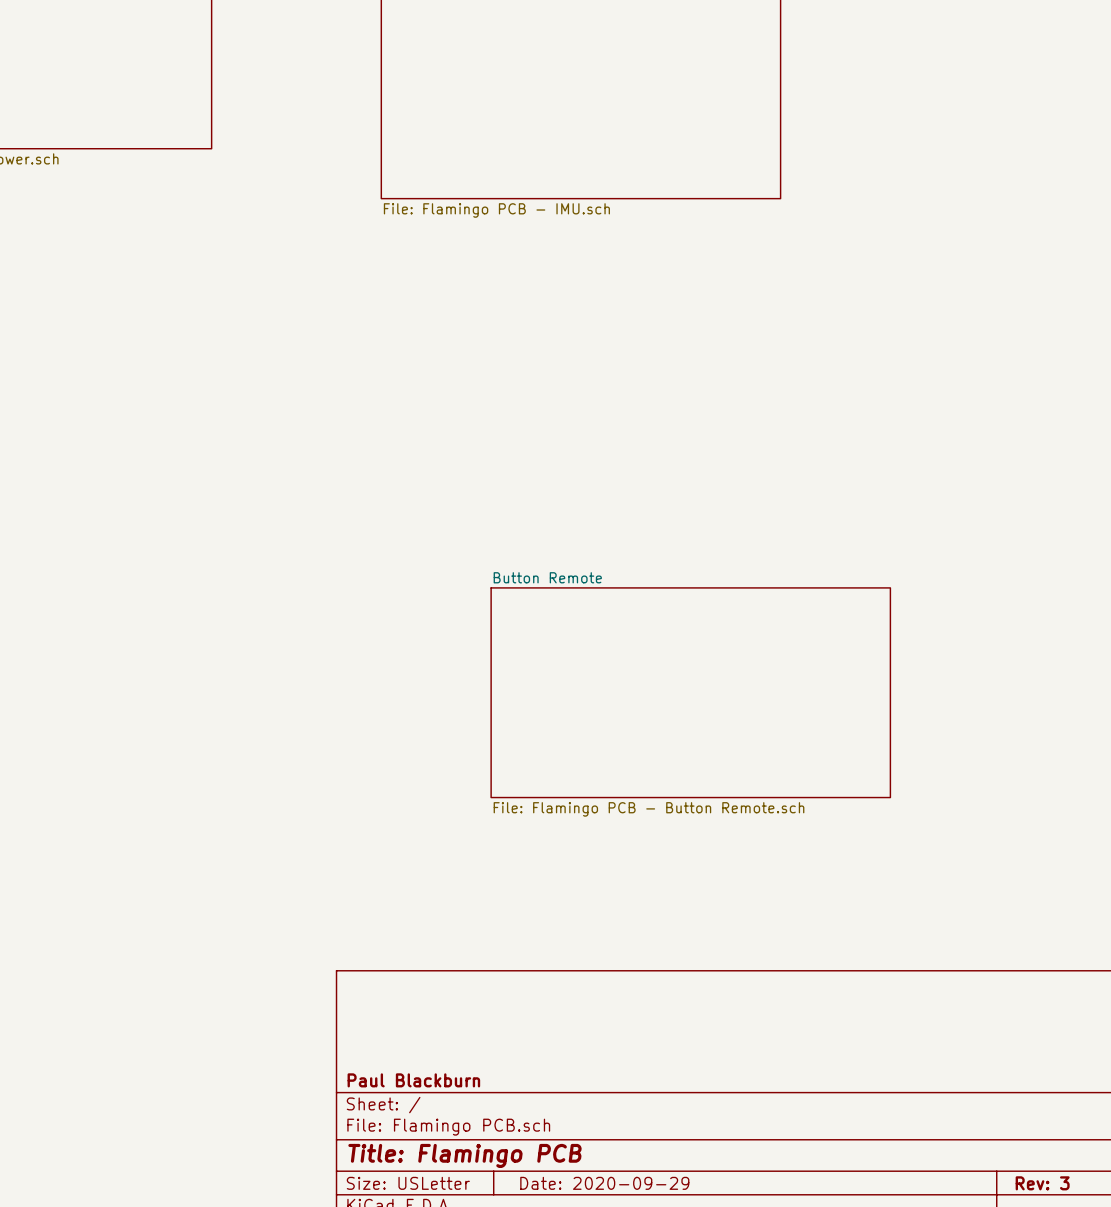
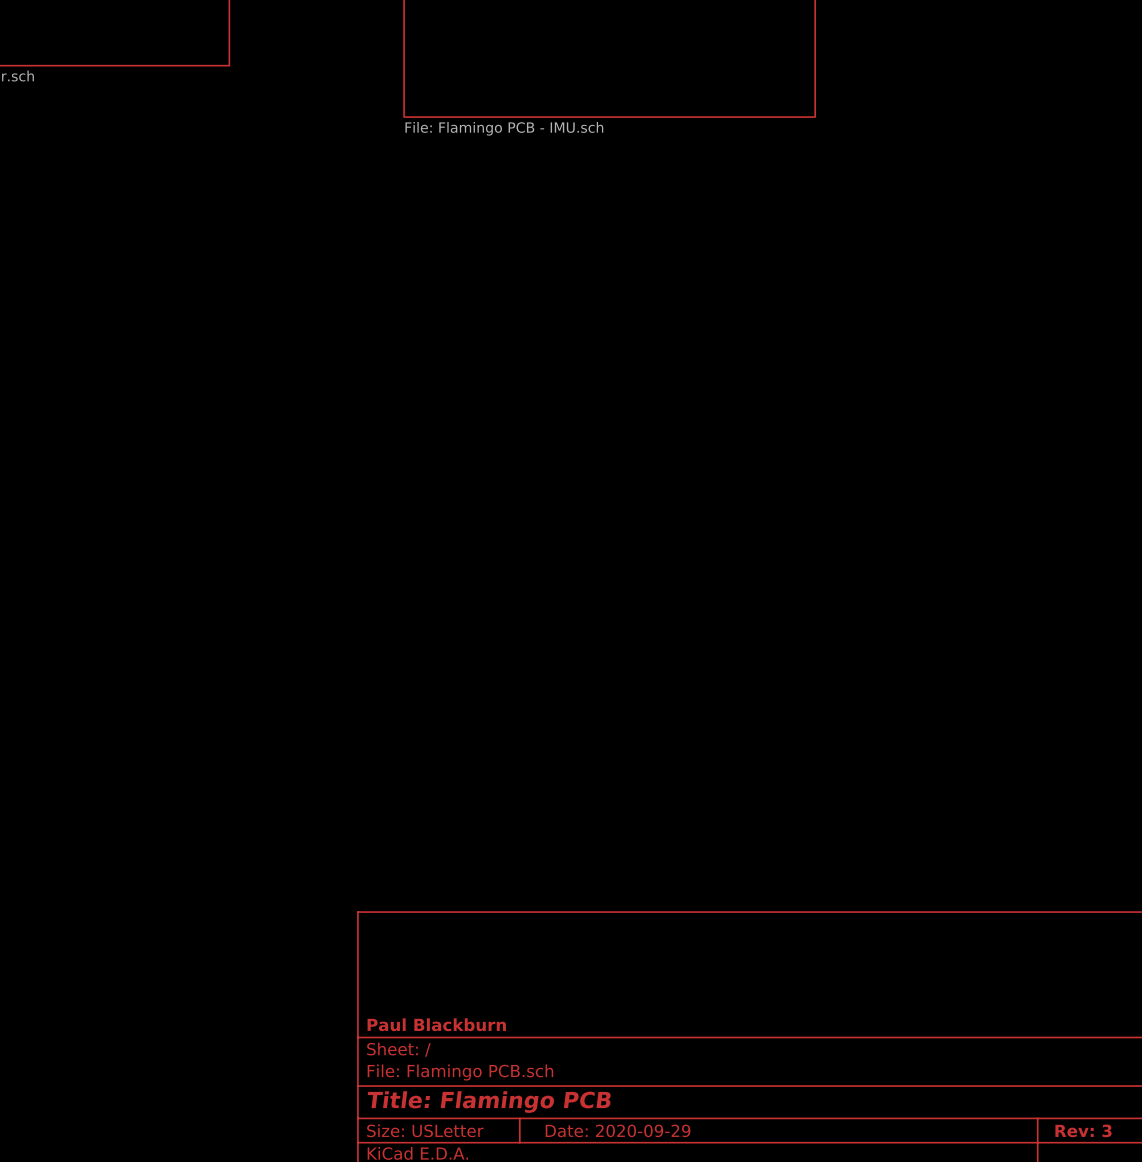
sheet Button Remote: File: Flamingo PCB - Button Remote.sch (690, 692) -> none

